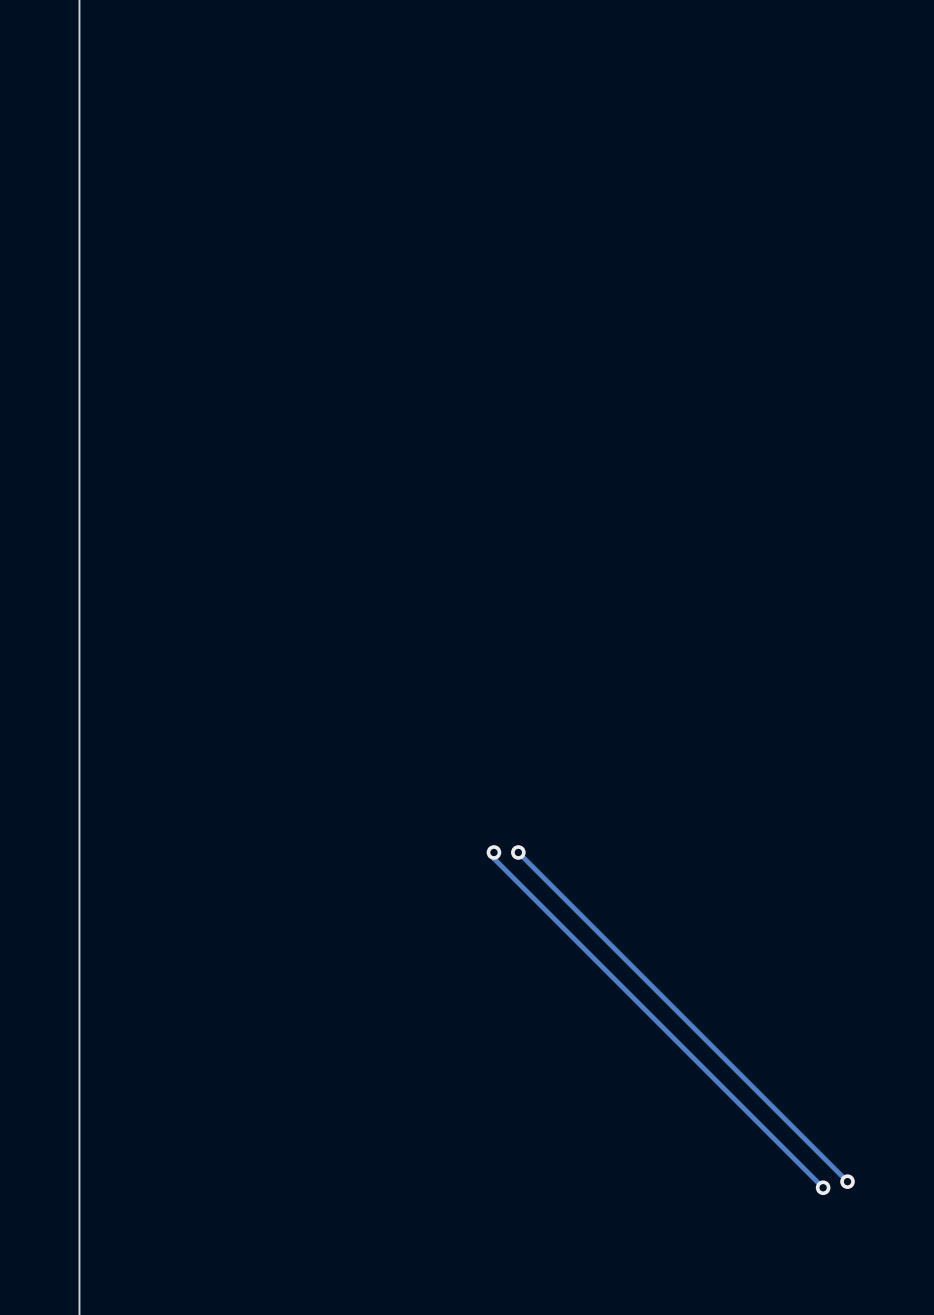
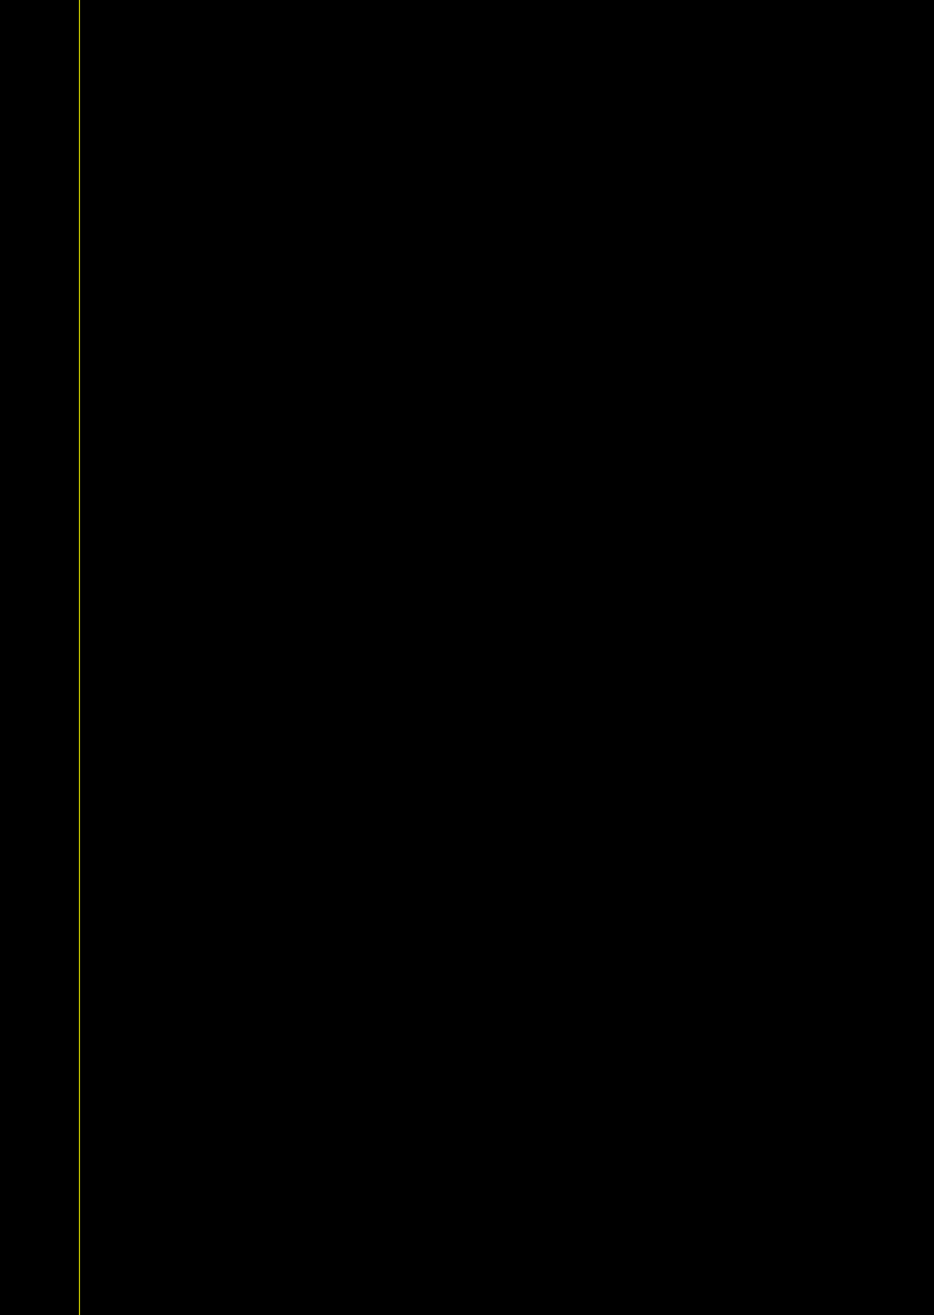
track: (493, 852) (493, 858) (823, 1187) -> none
via: (493, 852) -> none
track: (518, 852) (847, 1181) -> none
via: (518, 852) -> none
via: (847, 1181) -> none
via: (823, 1187) -> none

